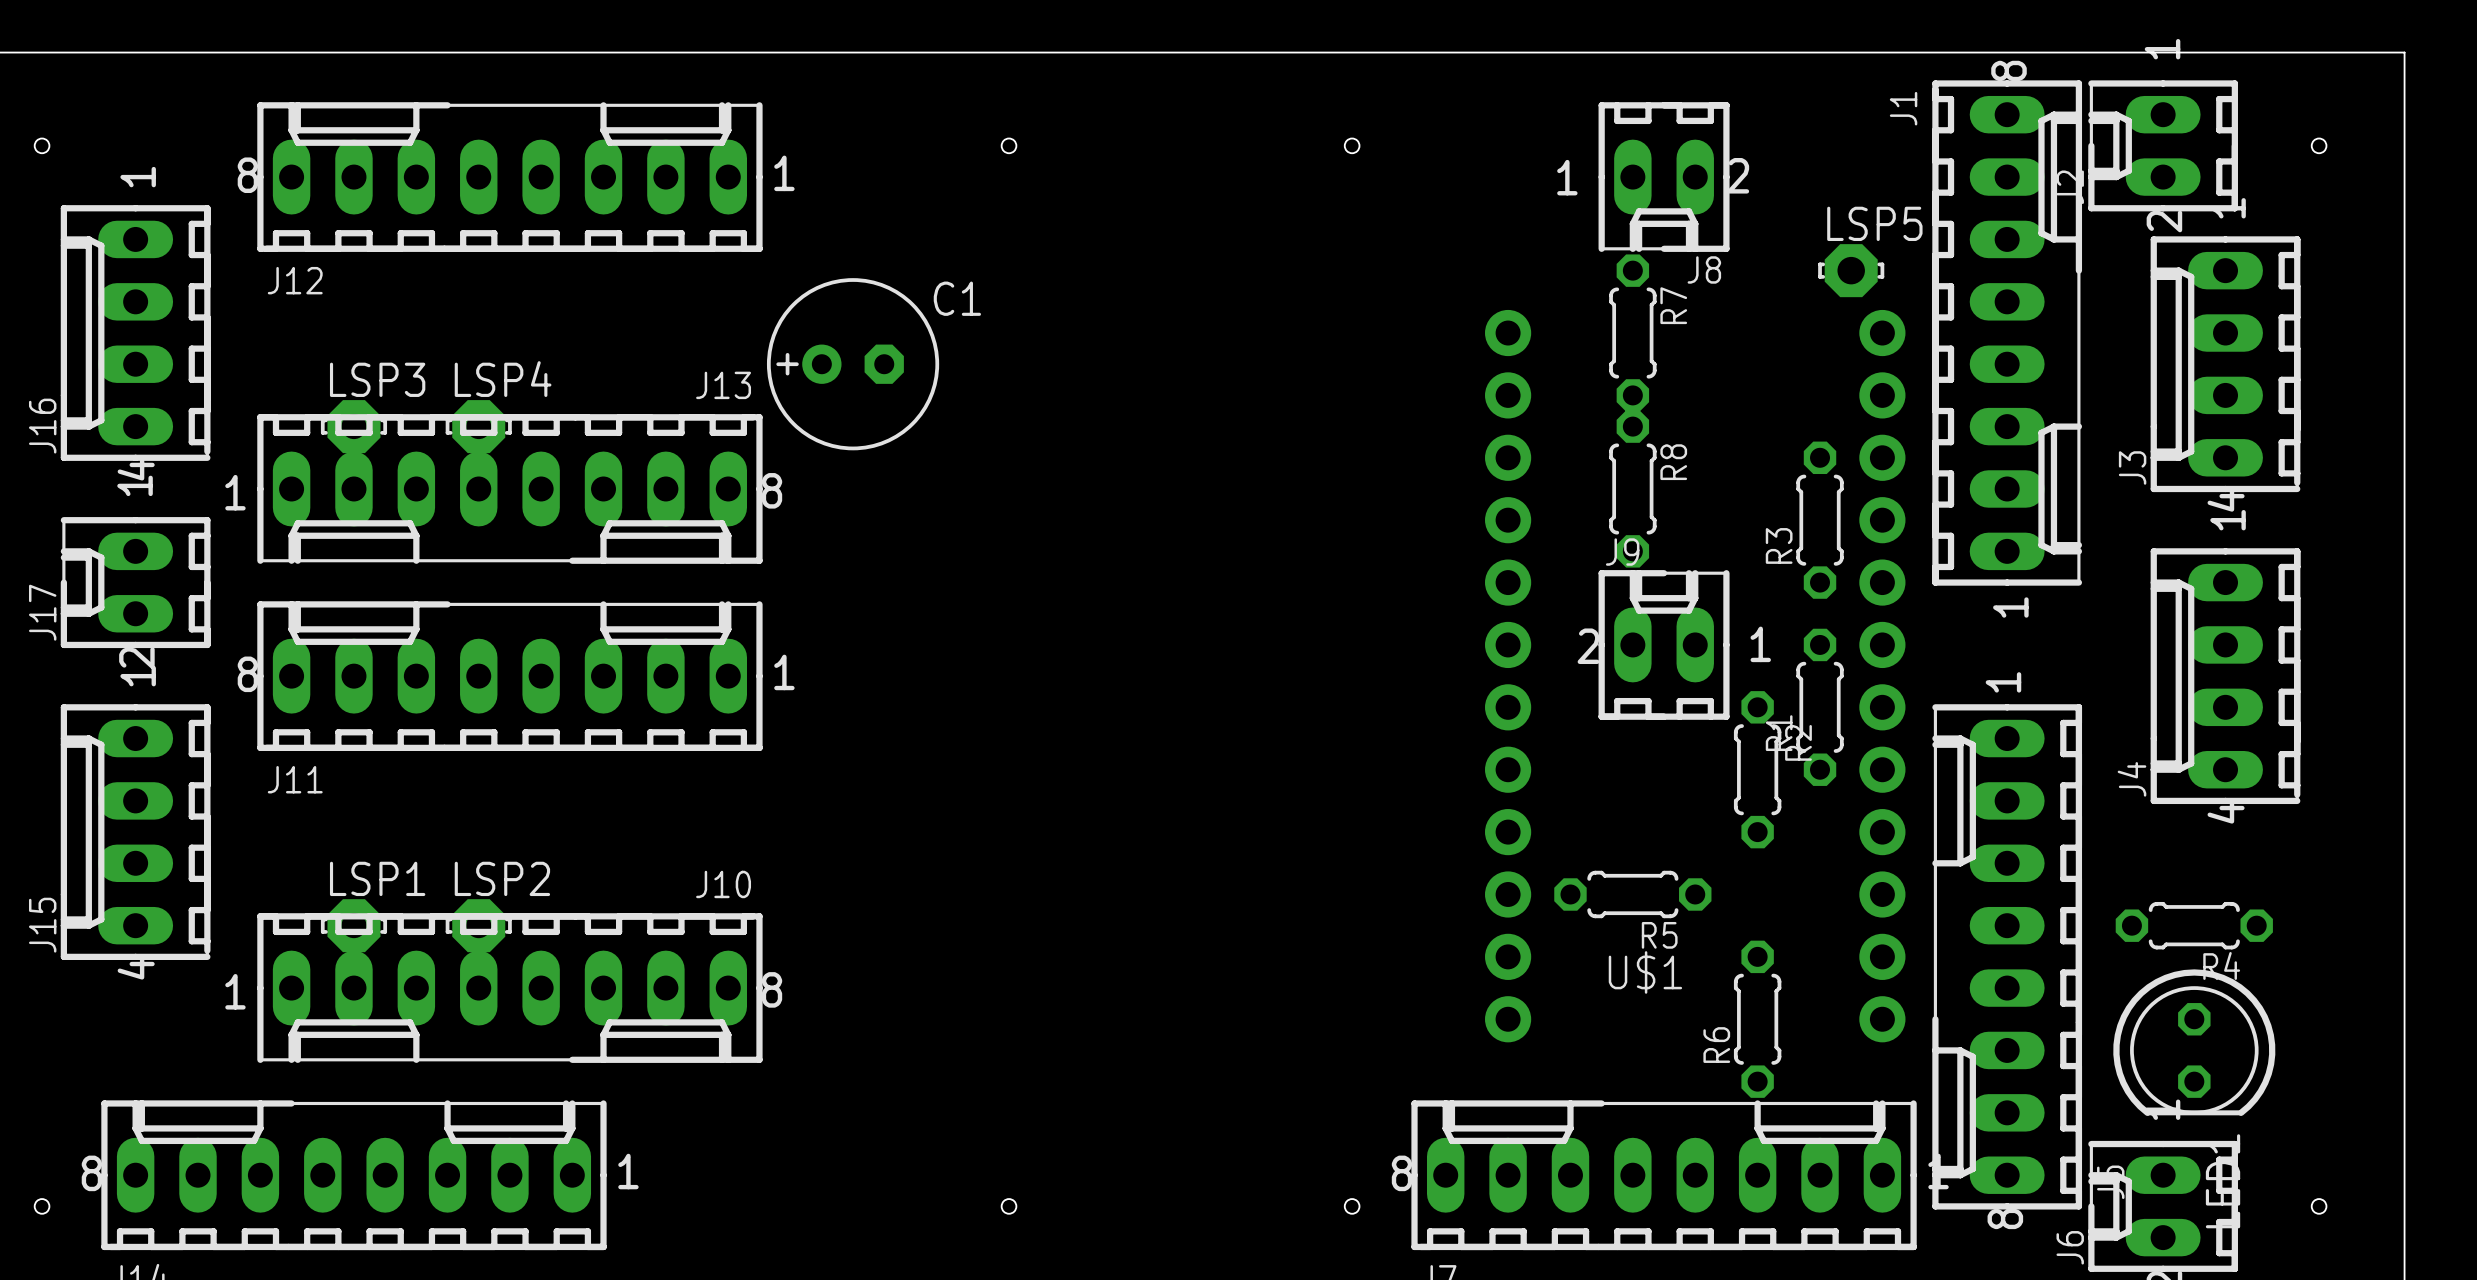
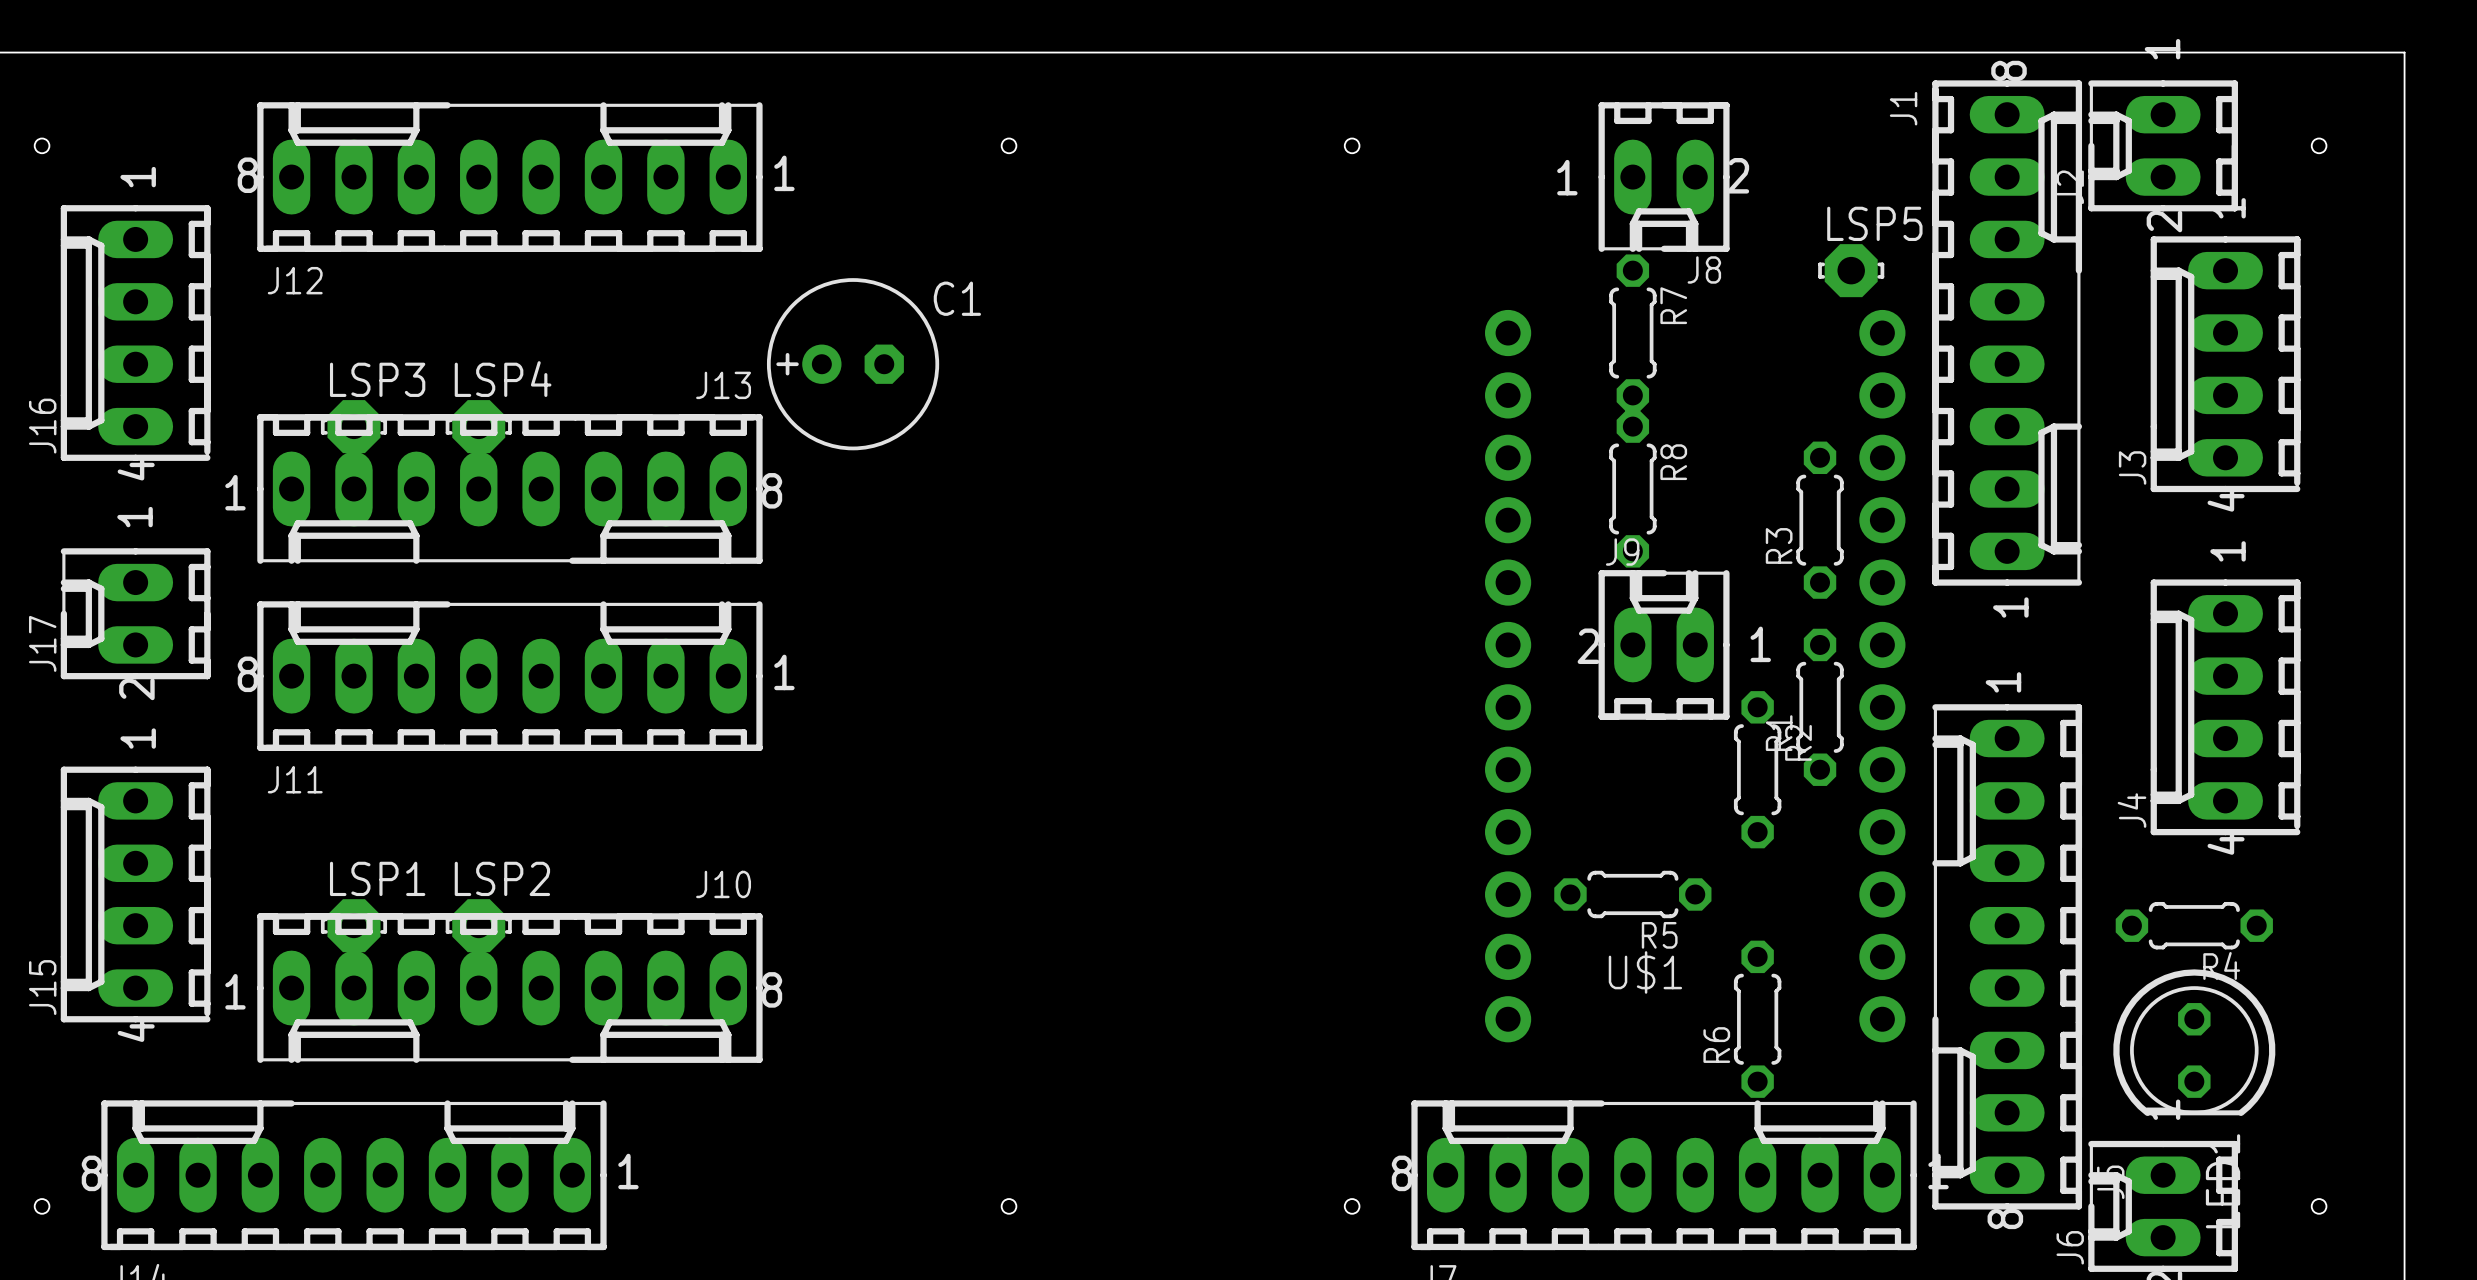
J17 position: (135, 582) -> (135, 613)
J4 position: (2225, 676) -> (2225, 707)
J15 position: (135, 832) -> (135, 894)

